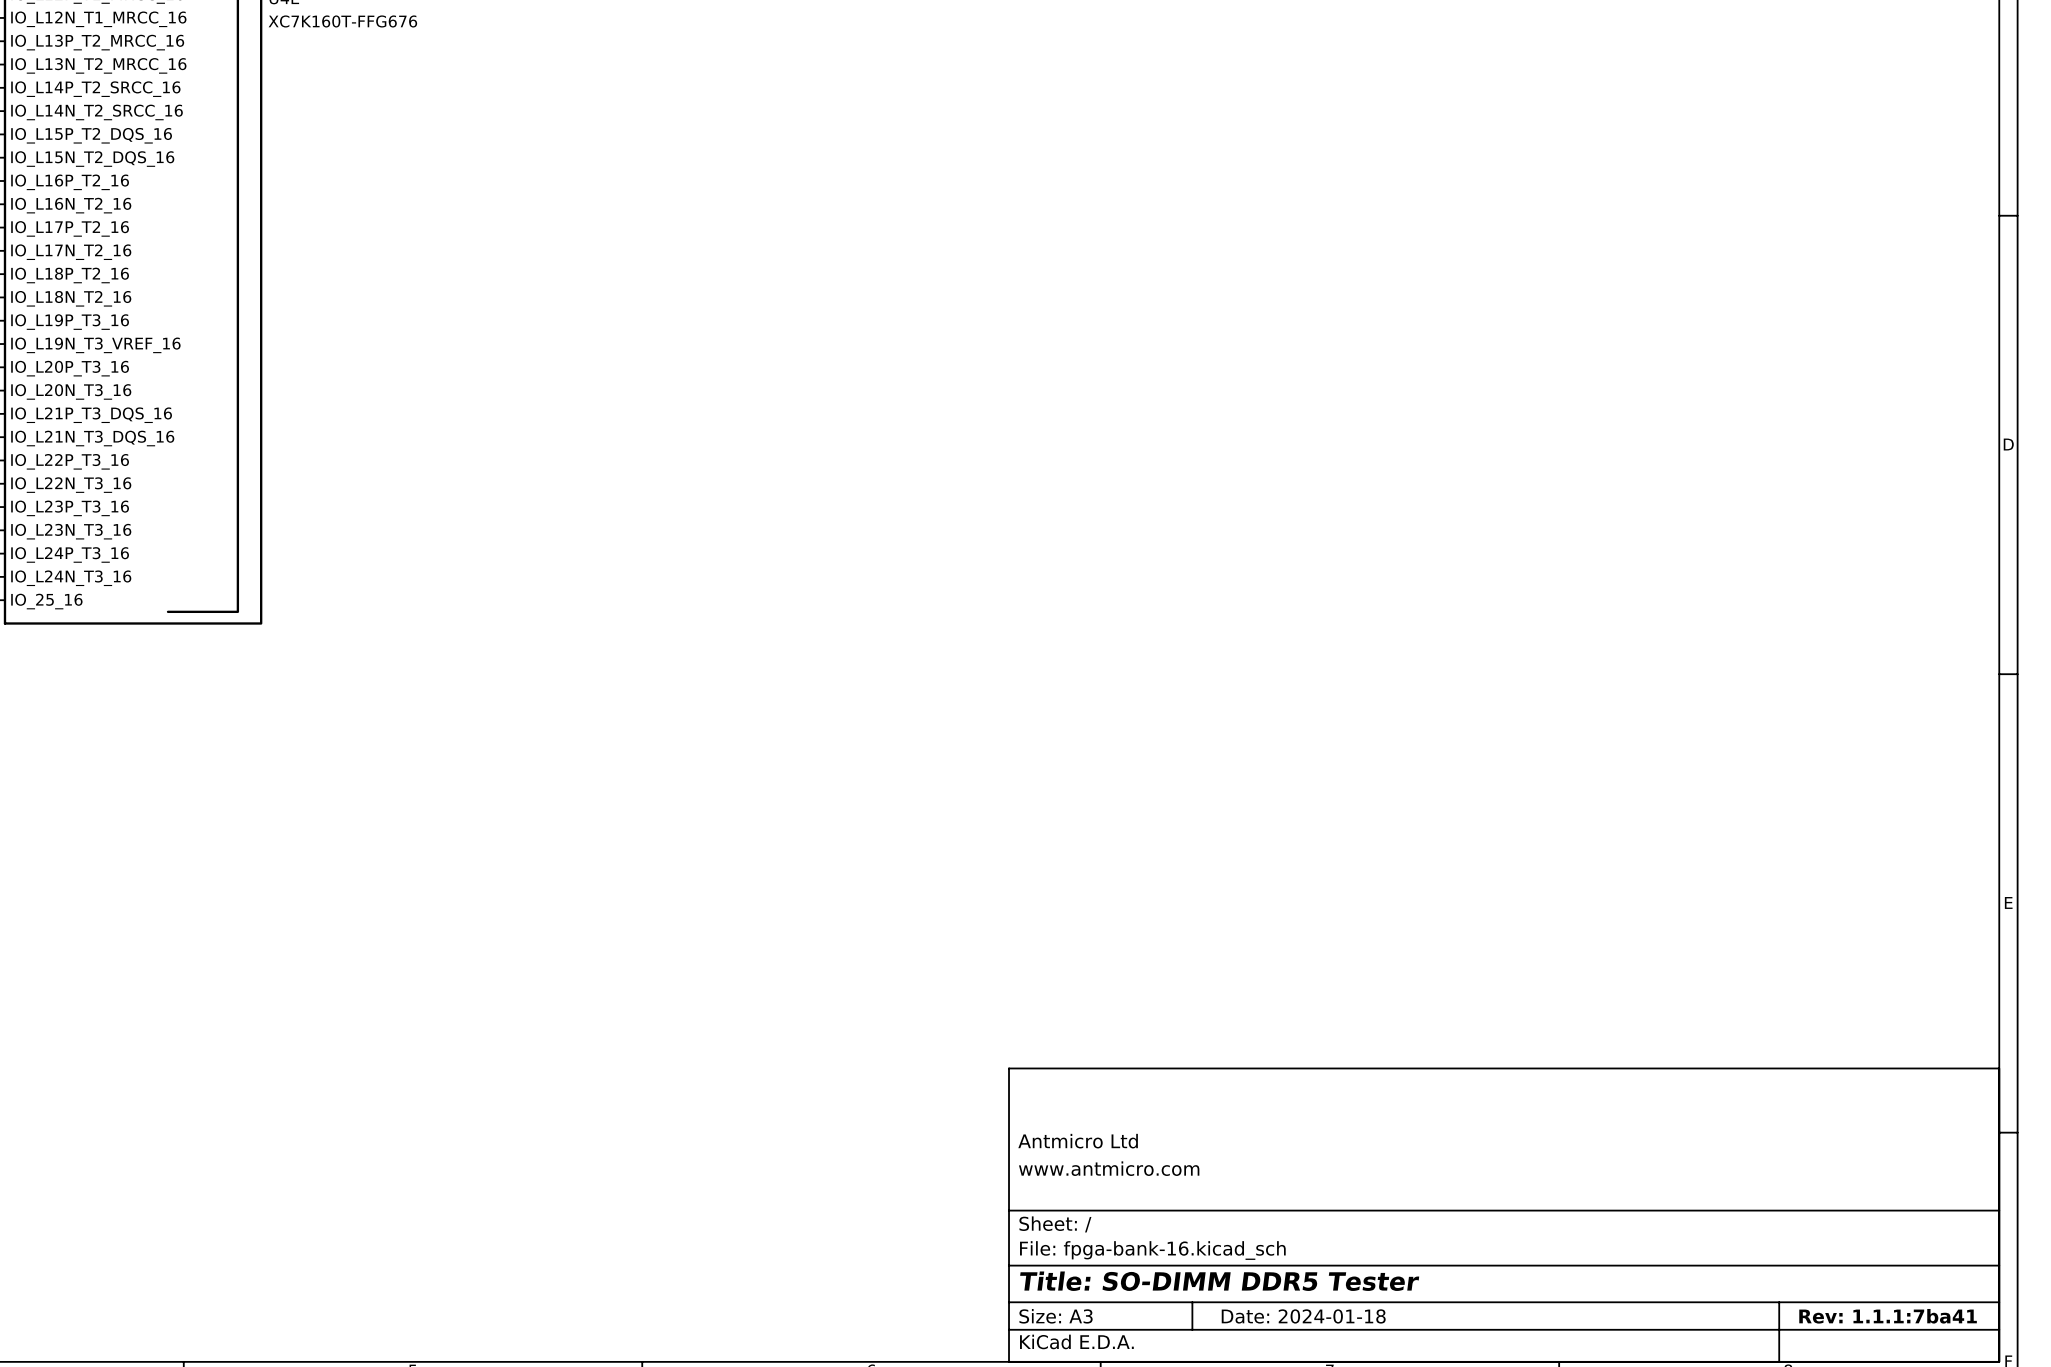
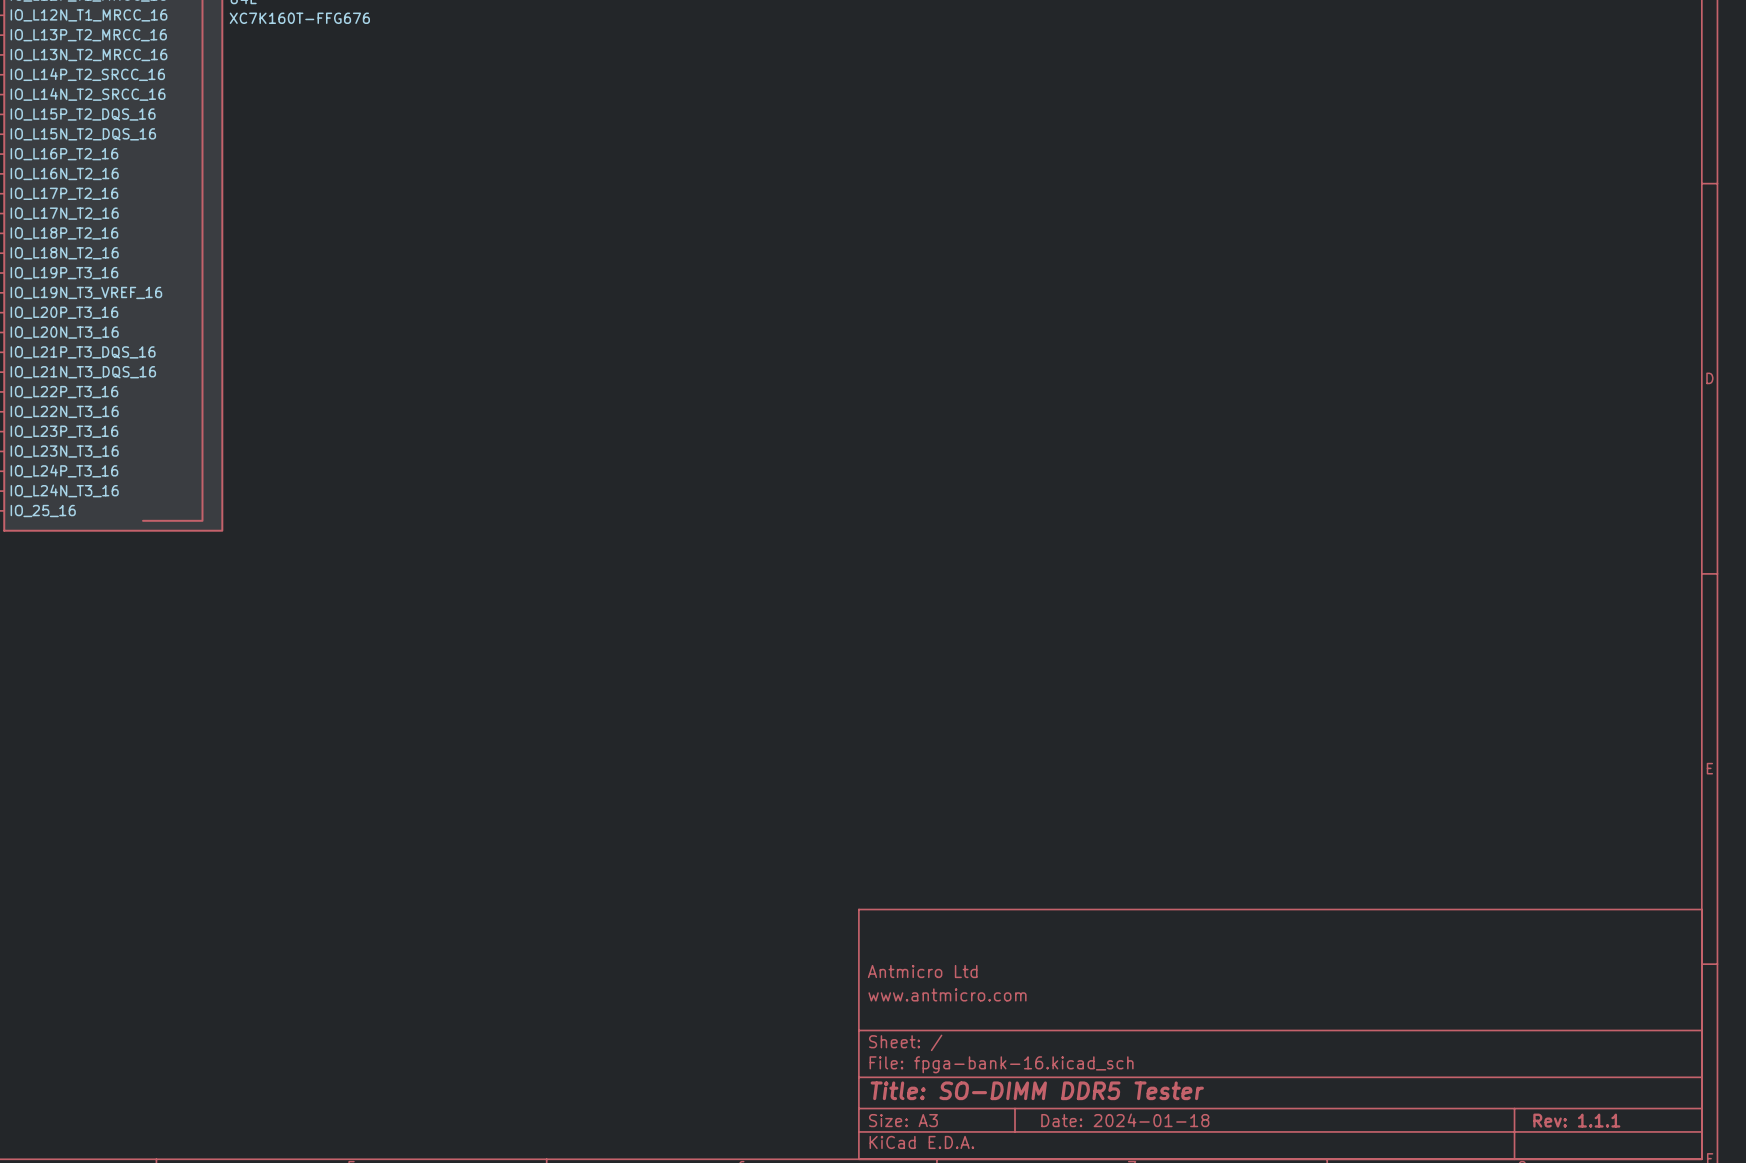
title block: Rev: 1.1.1:7ba41 (1888, 1316) -> Rev: 1.1.1 (1576, 1120)

